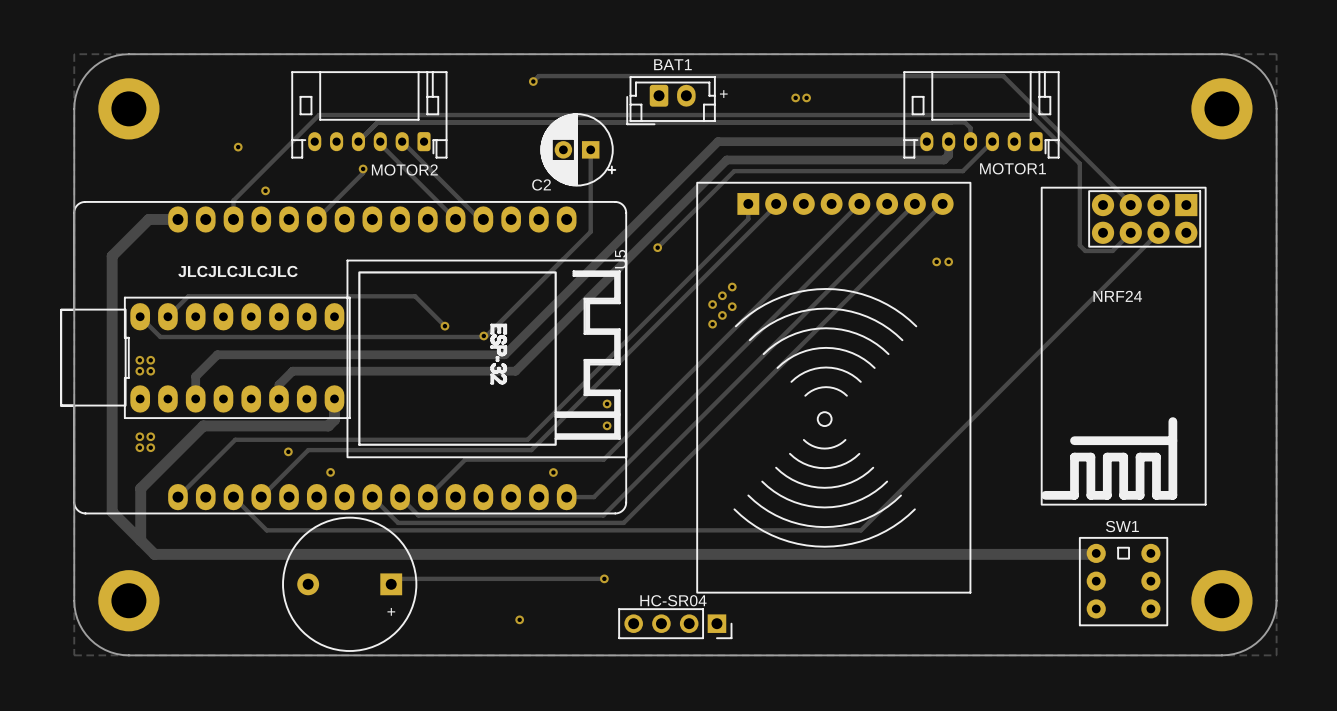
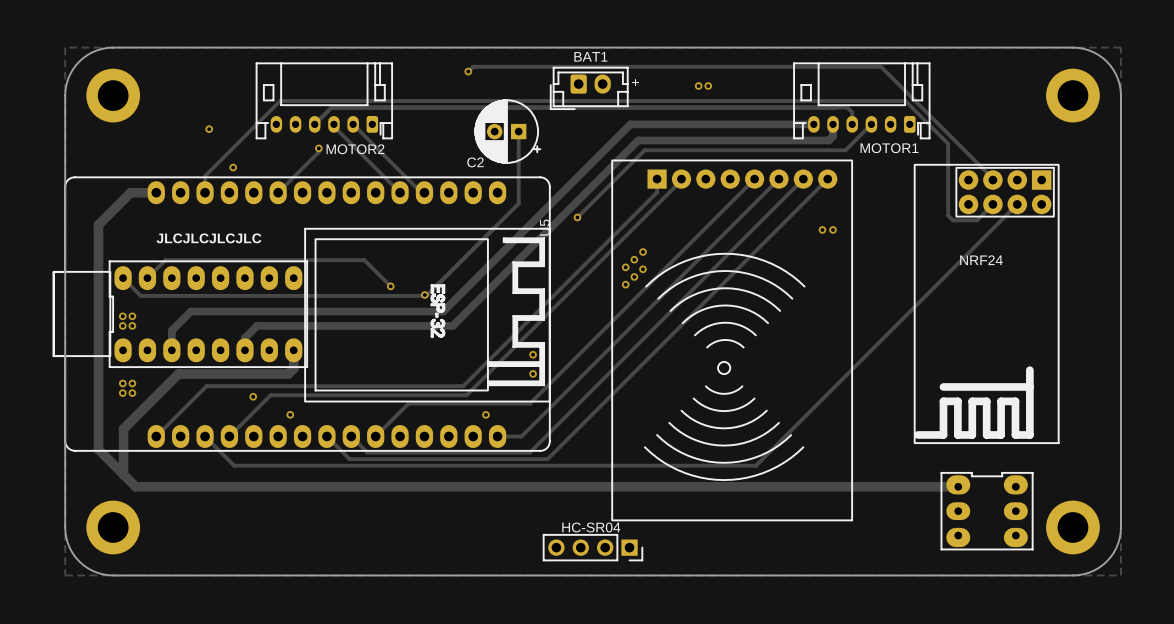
track: (604, 578) (396, 578) (391, 584) -> none
via: (604, 578) -> none
SW1: (1123, 581) -> none
part: none -> (987, 511)
part: (349, 584) -> none
via: (519, 619) -> none

